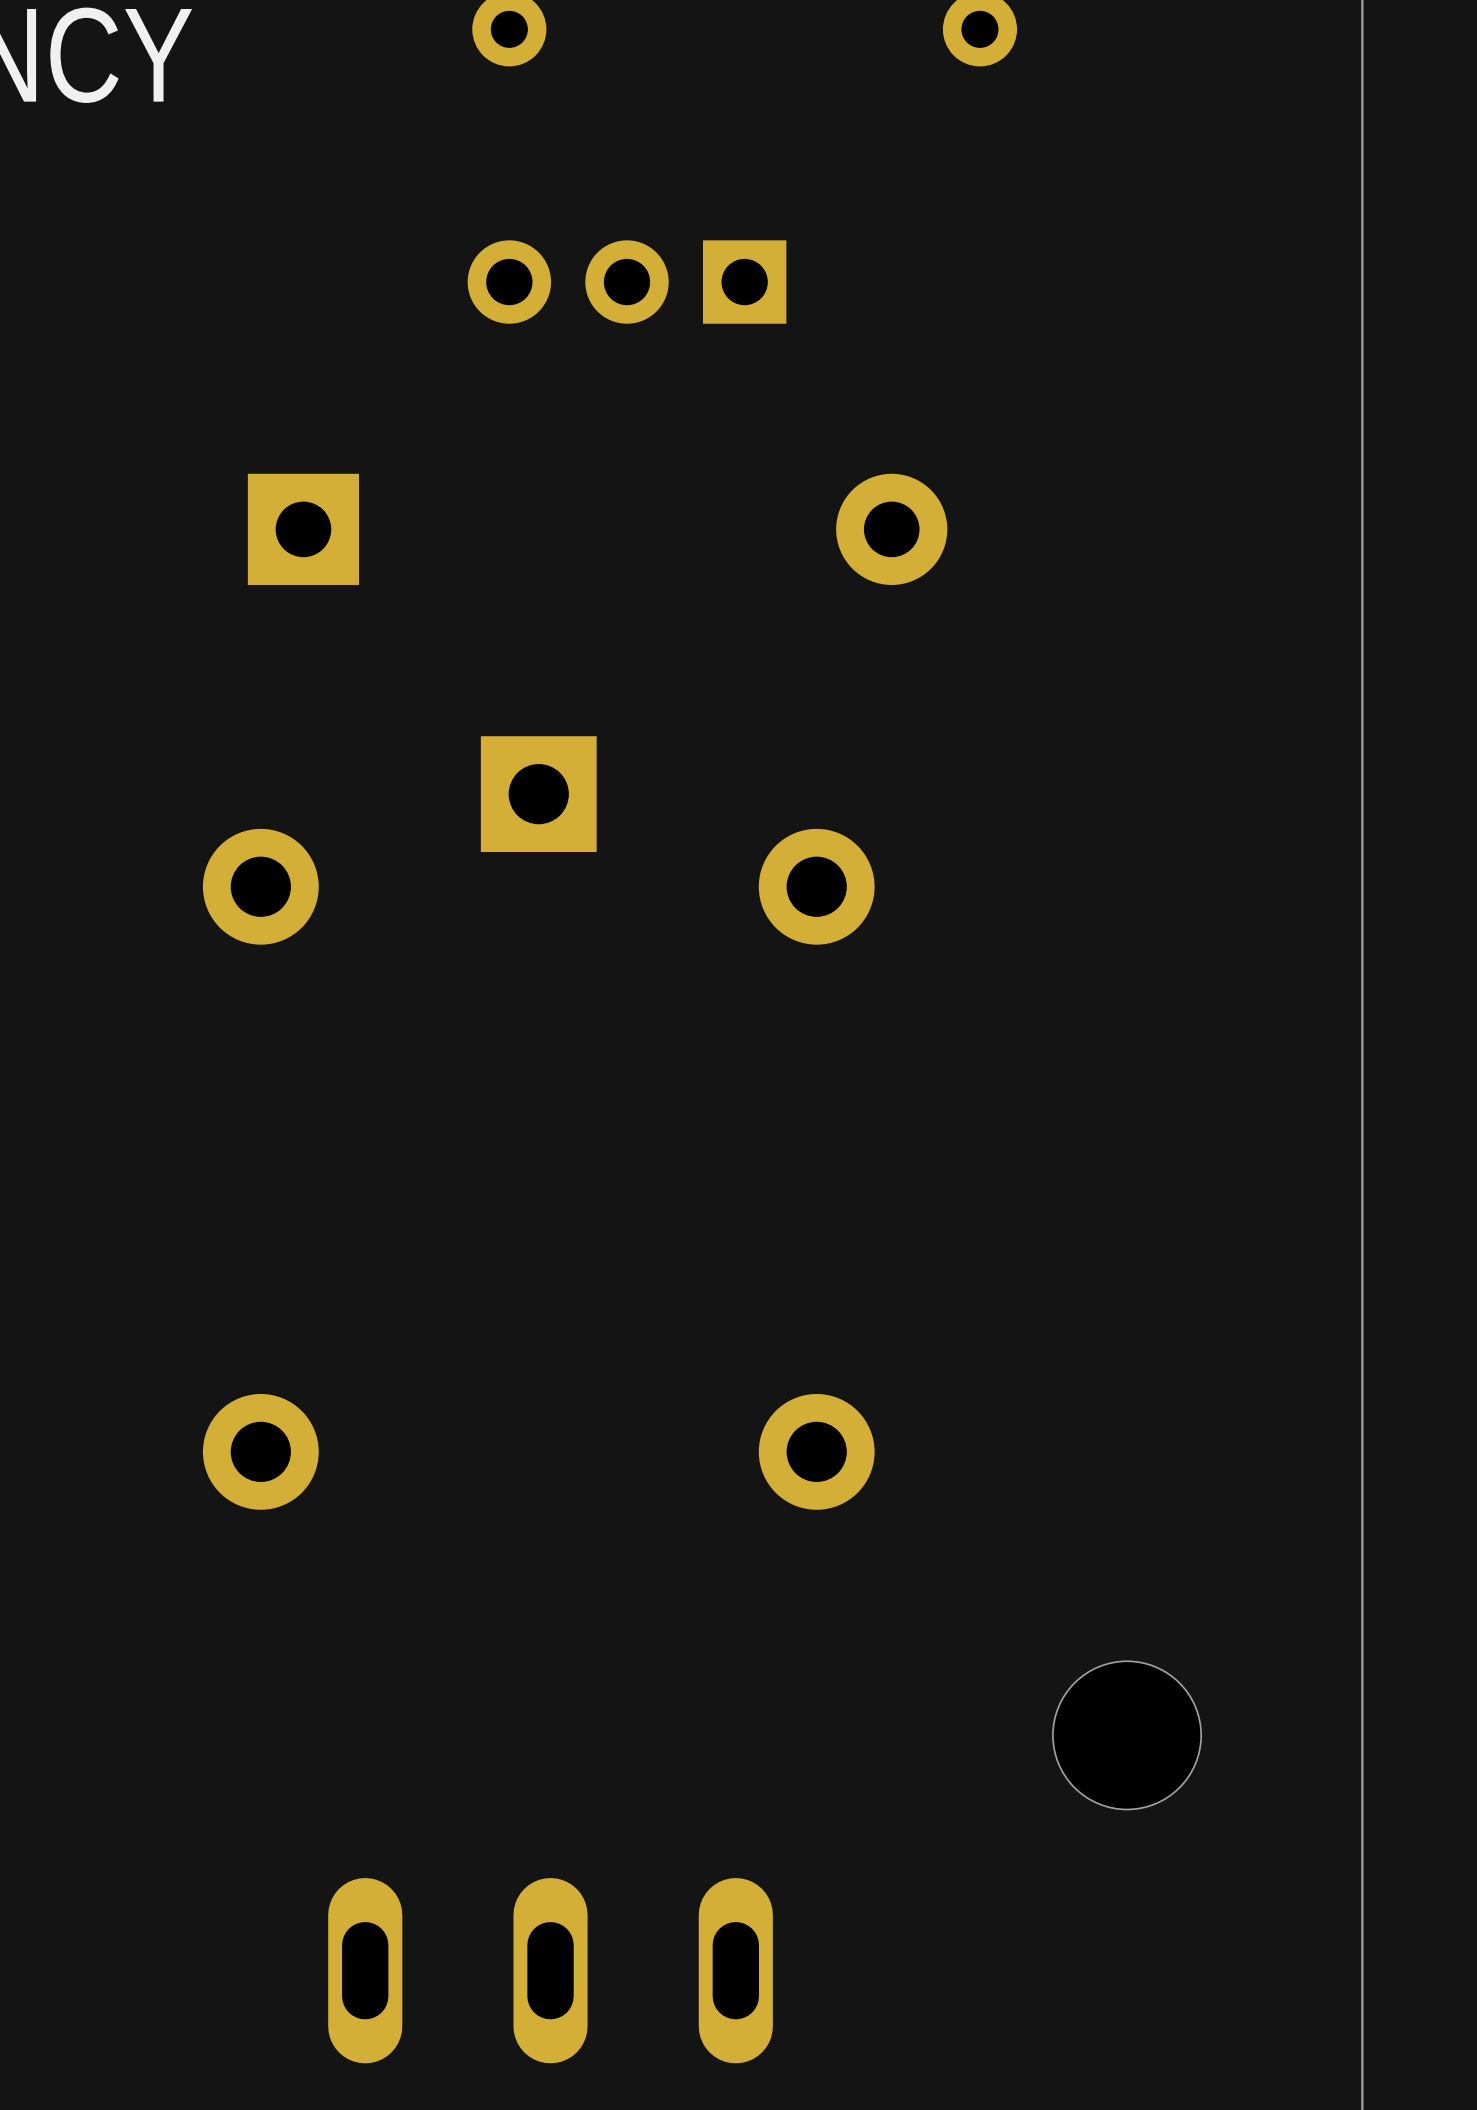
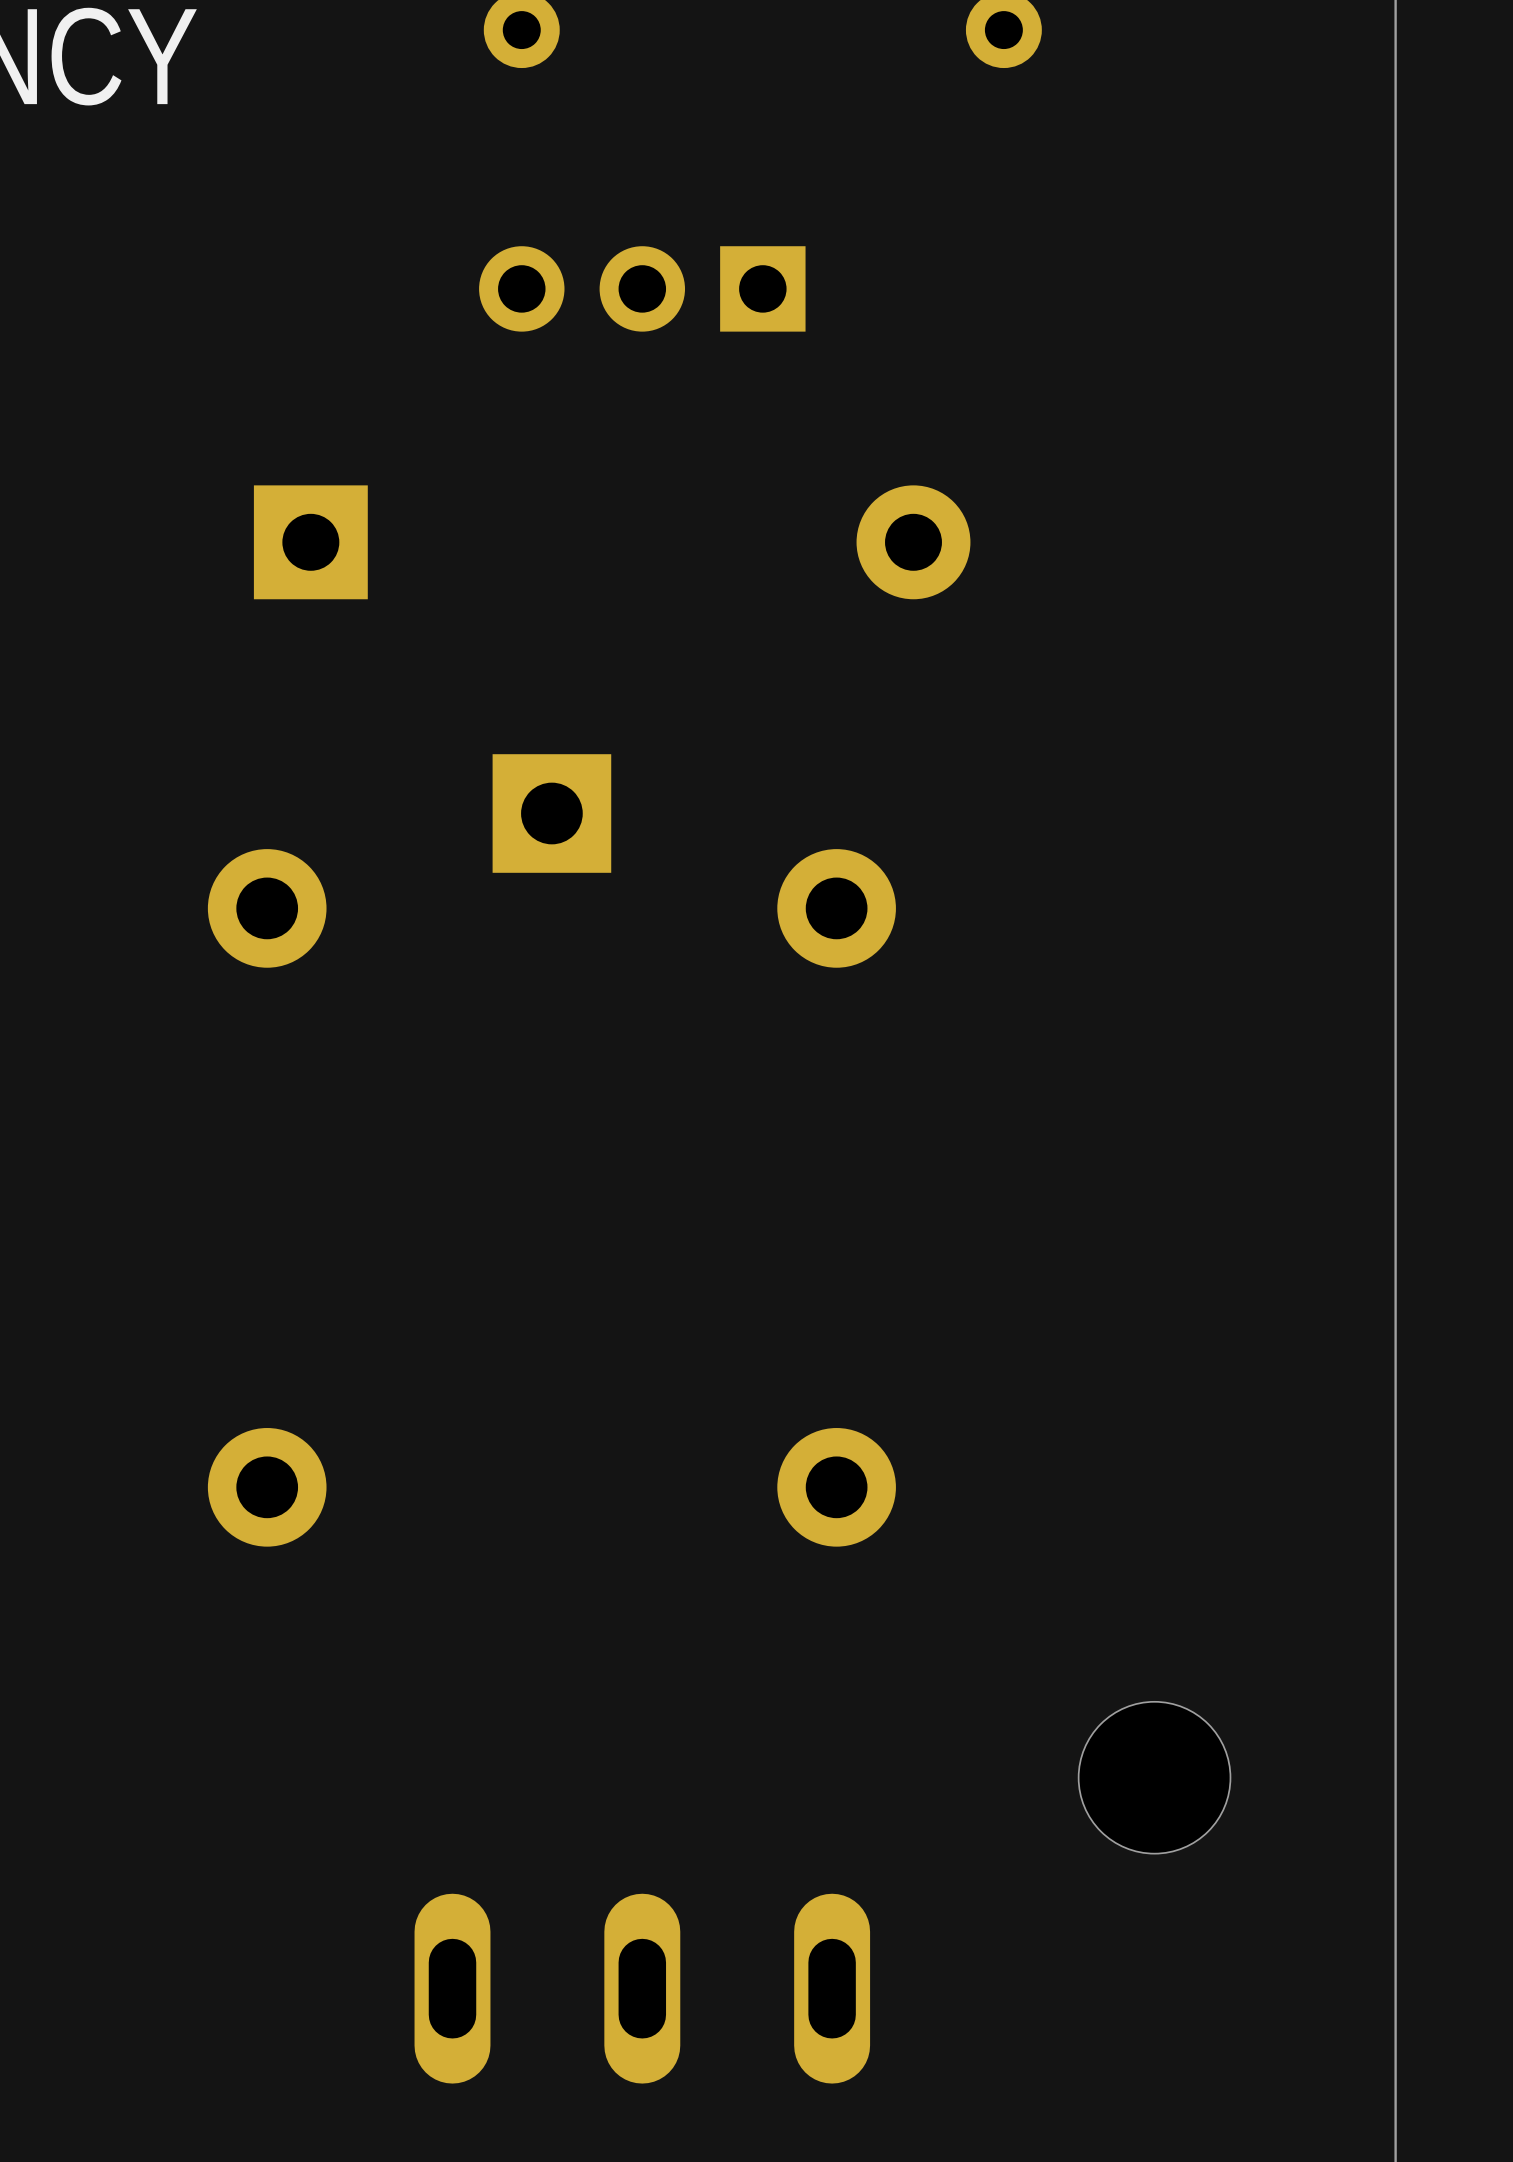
part position: (550, 1970) -> (642, 1988)

